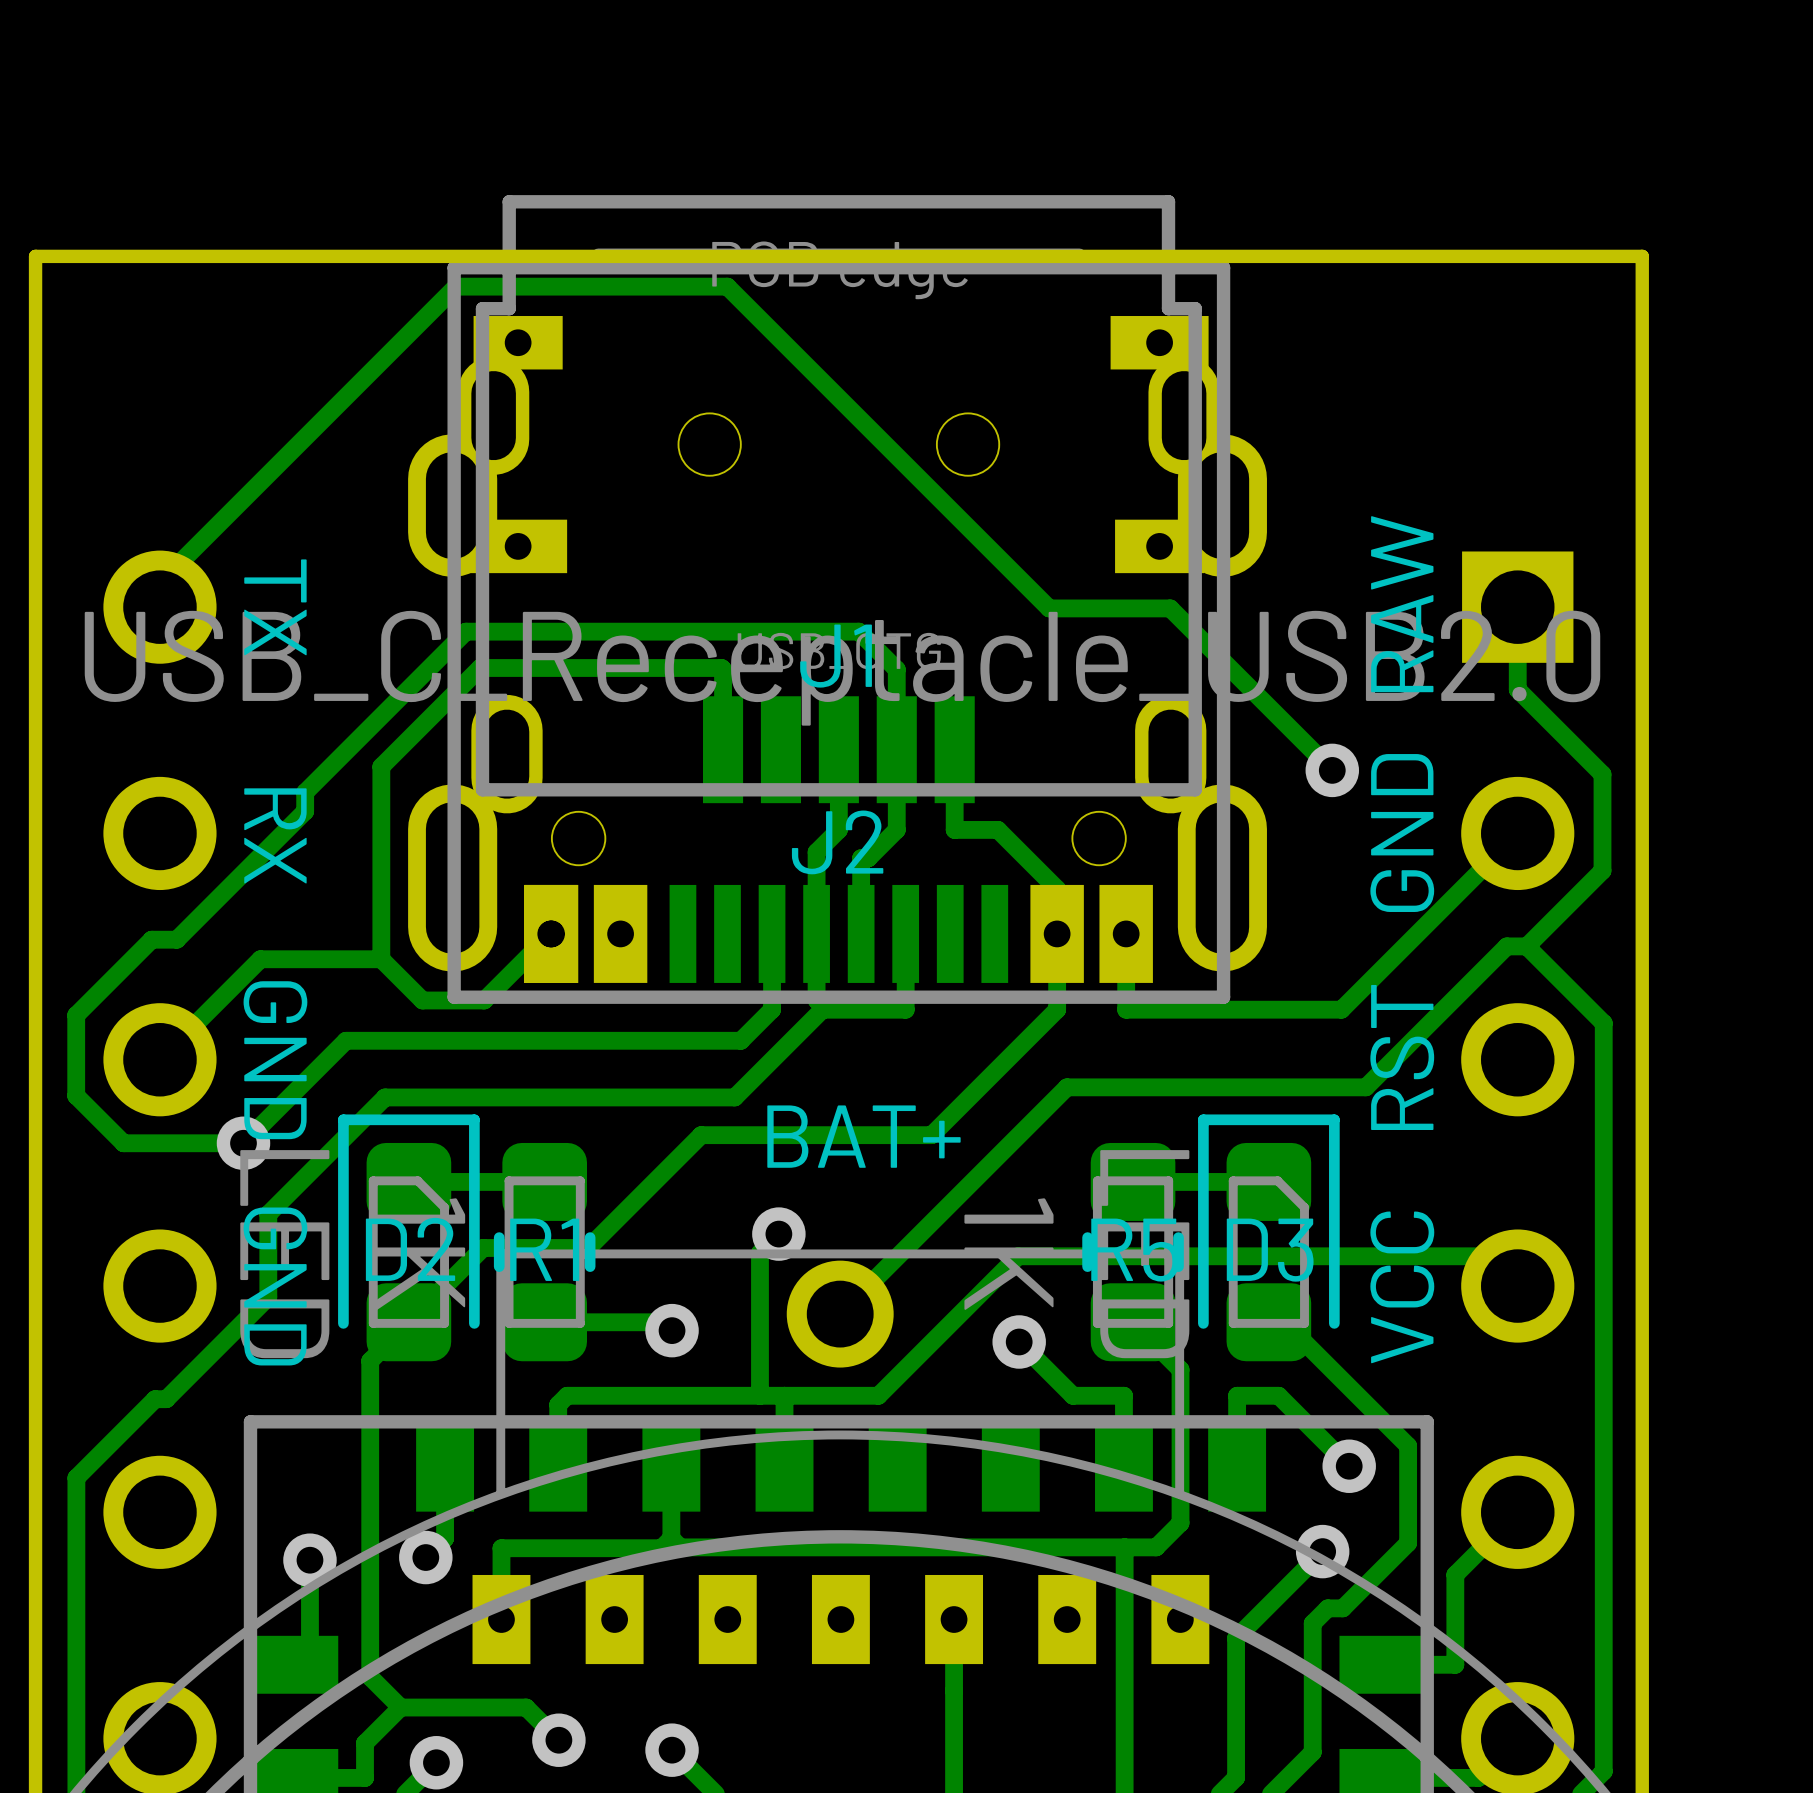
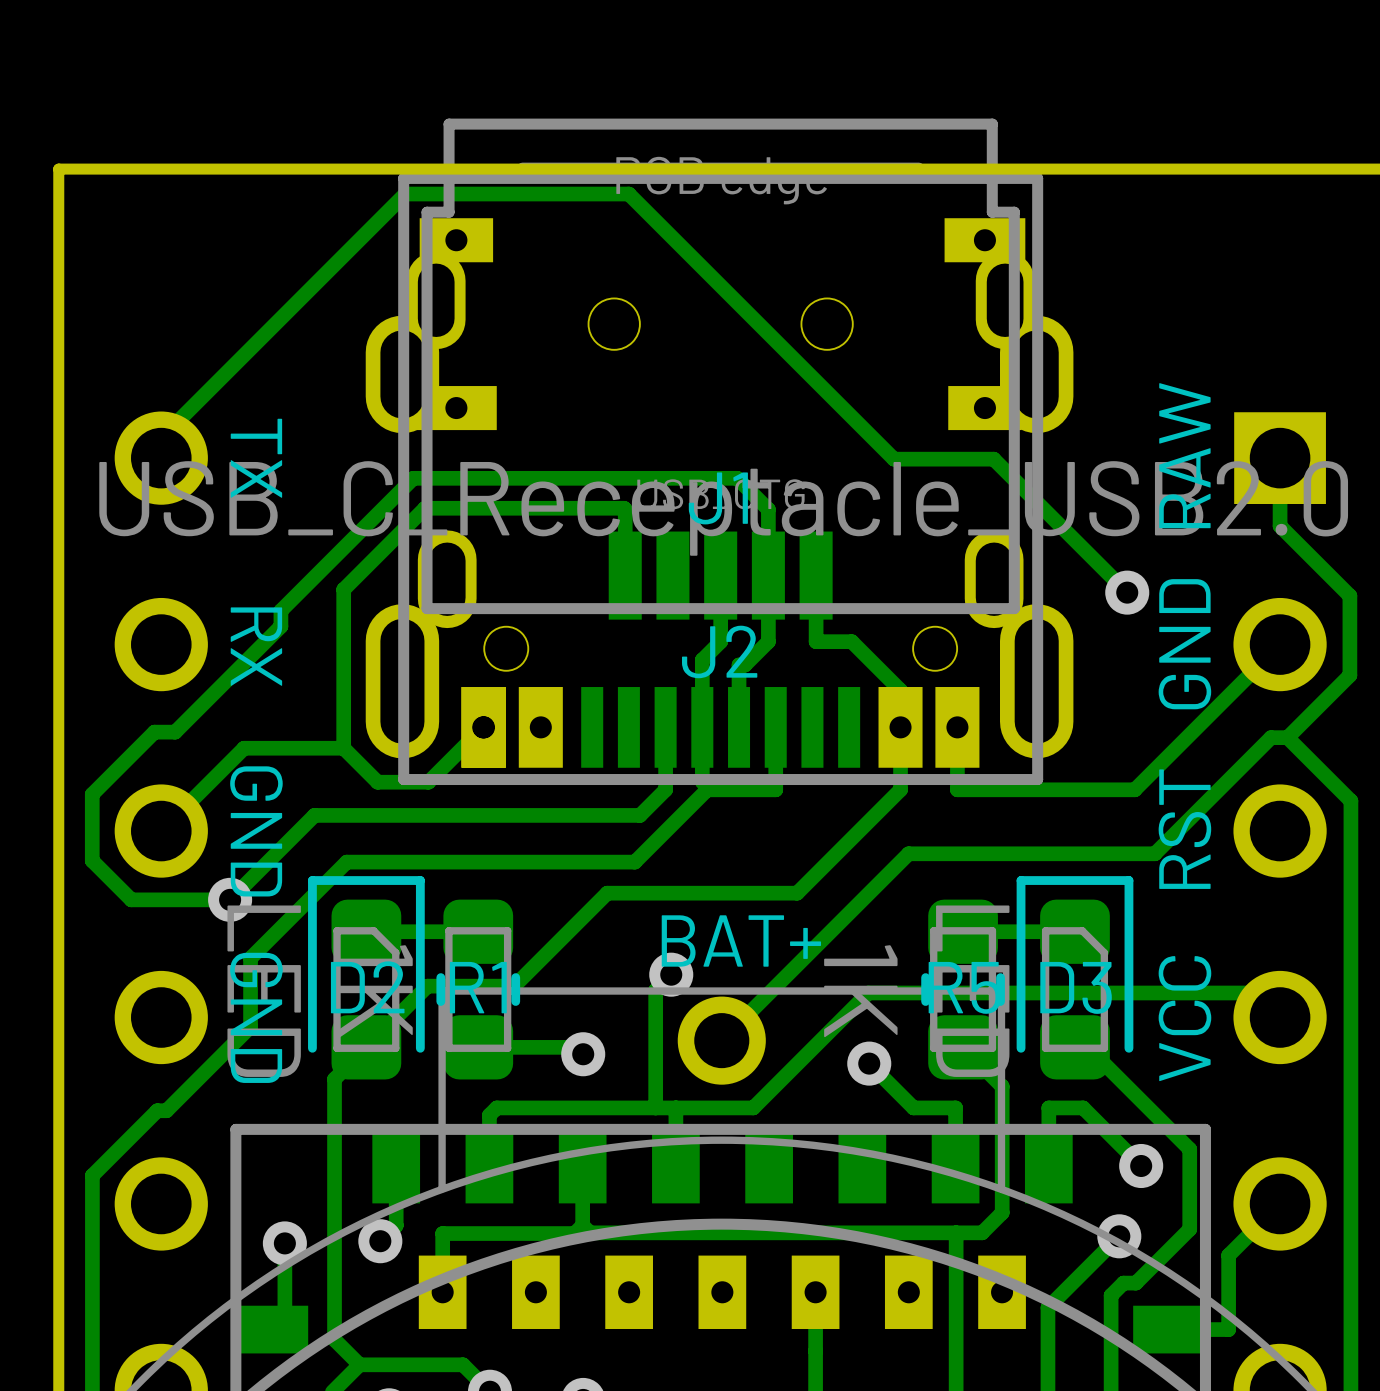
part text position: BAT+ (863, 1136) -> BAT+ (741, 940)

